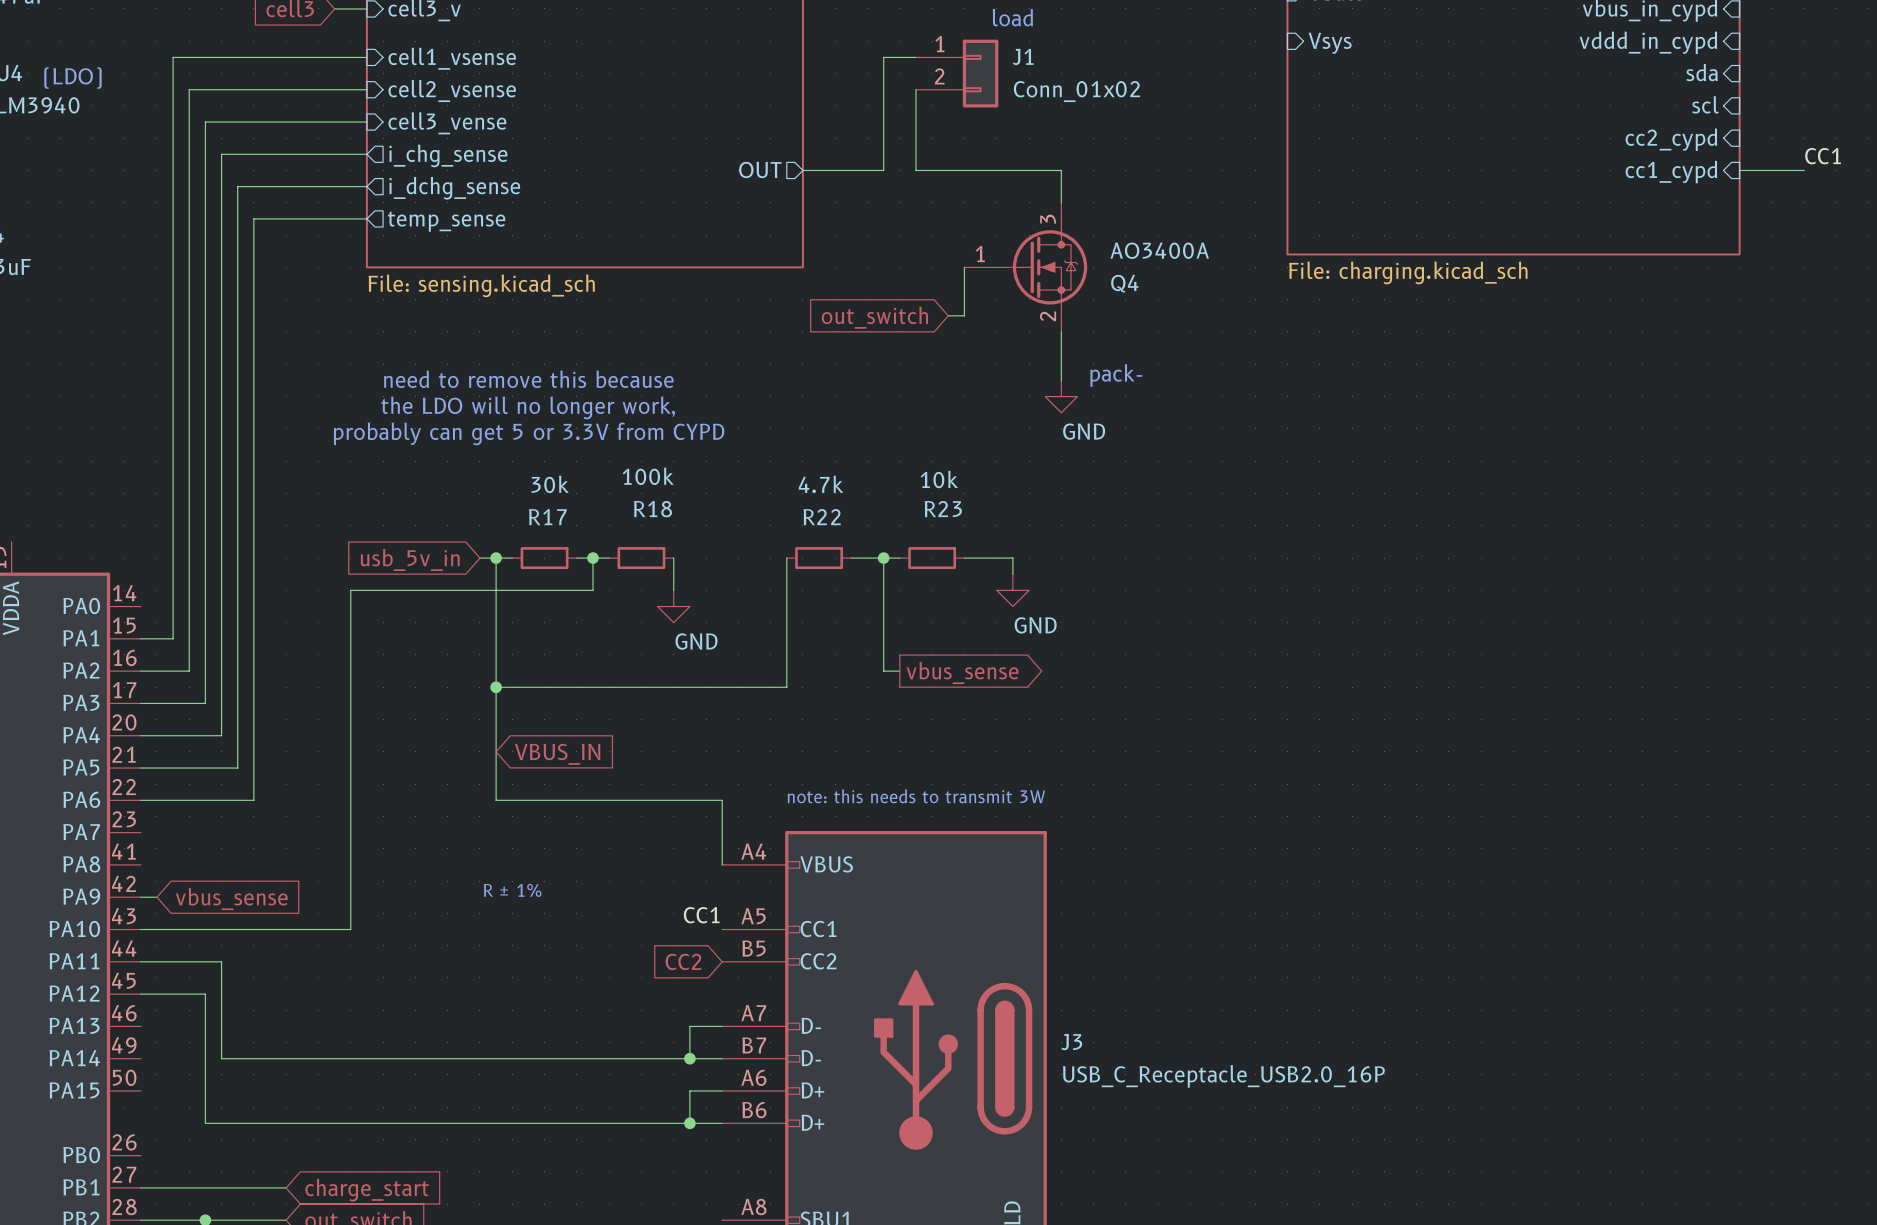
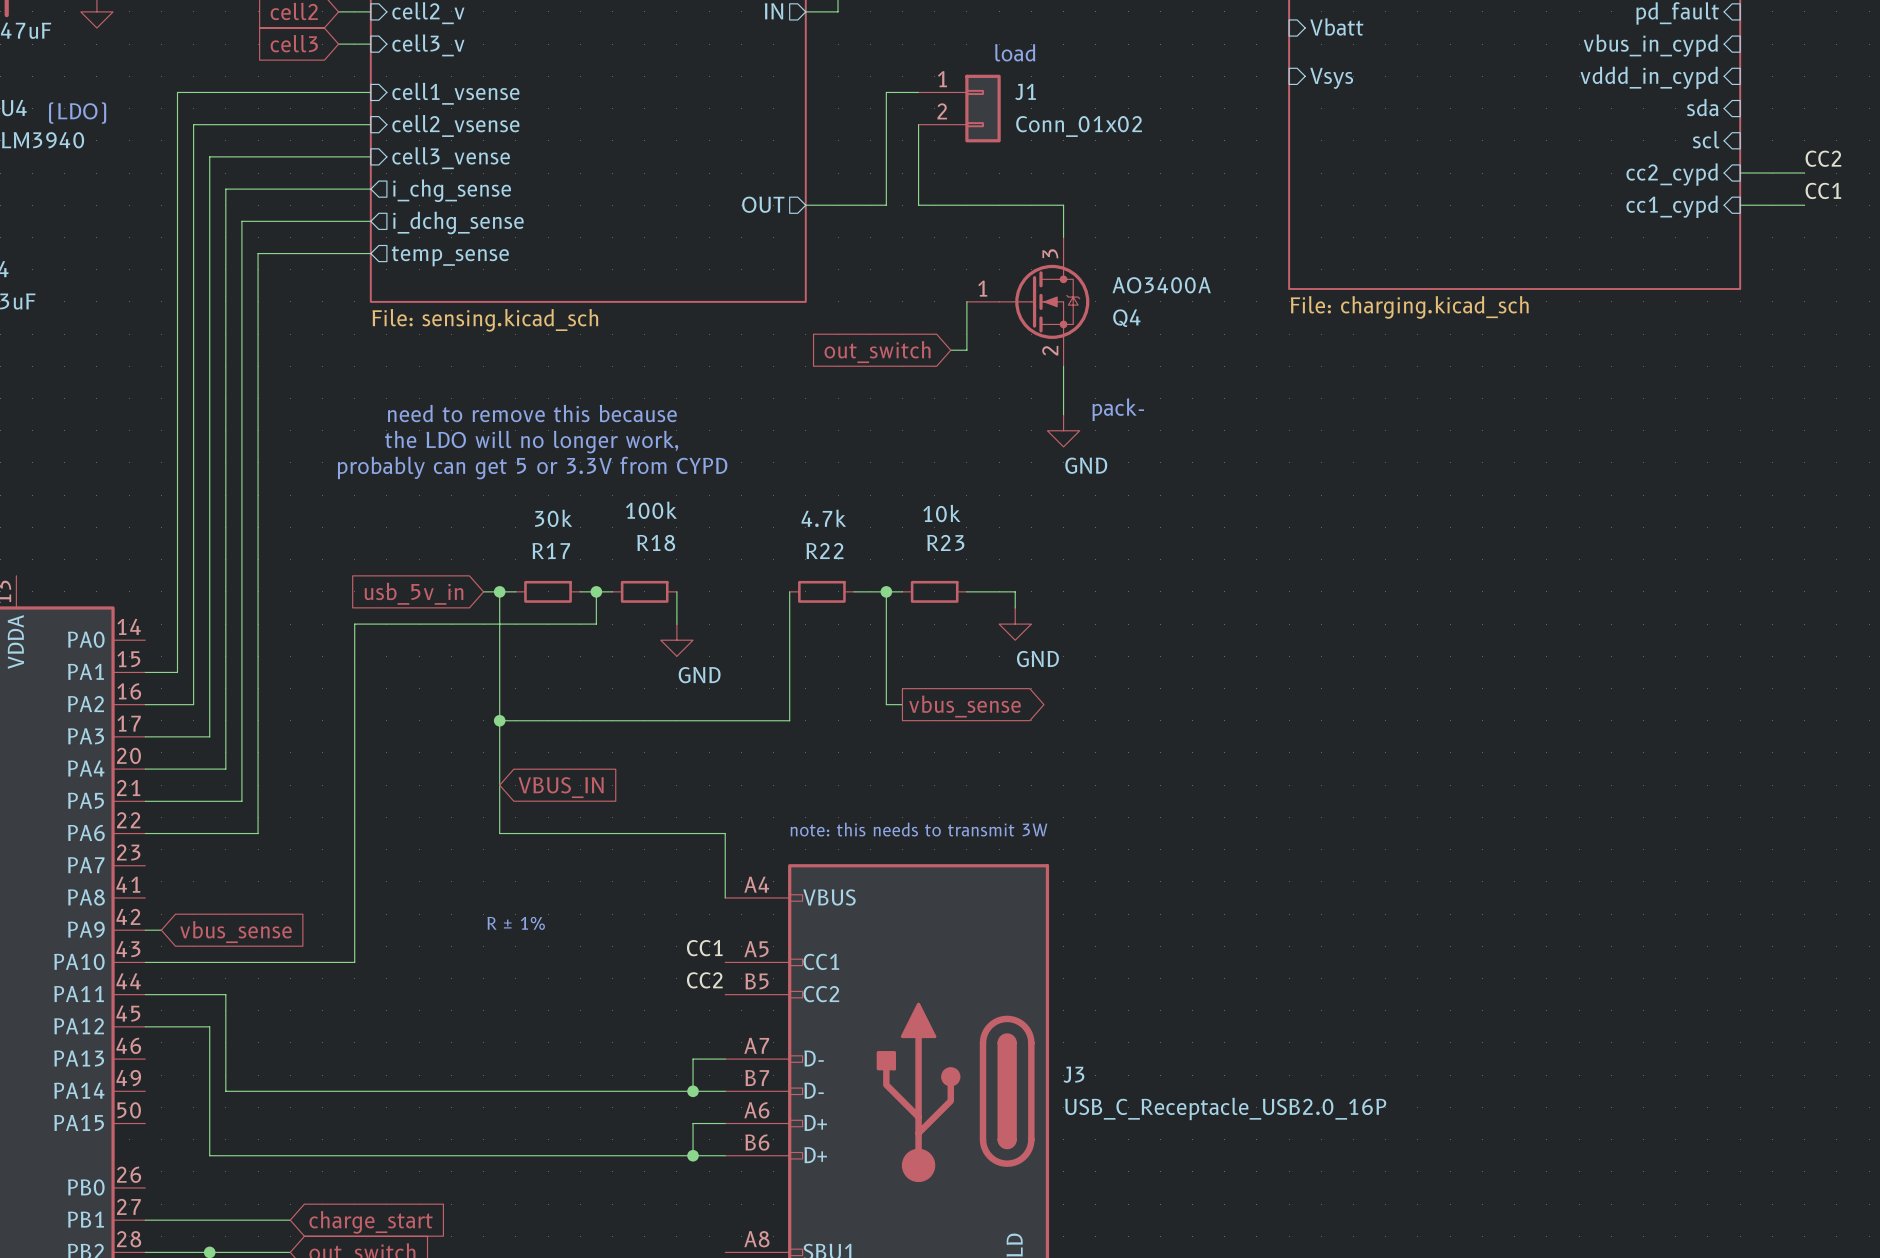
label: none -> CC2 (1823, 158)
wire: none -> (1740, 173) (1804, 173)
label: none -> CC2 (704, 980)
global label: CC2 (683, 961) -> none

